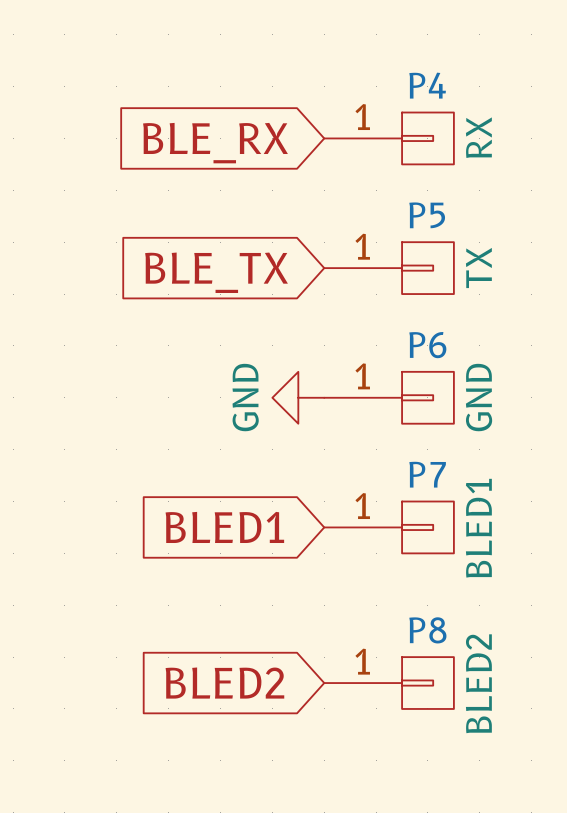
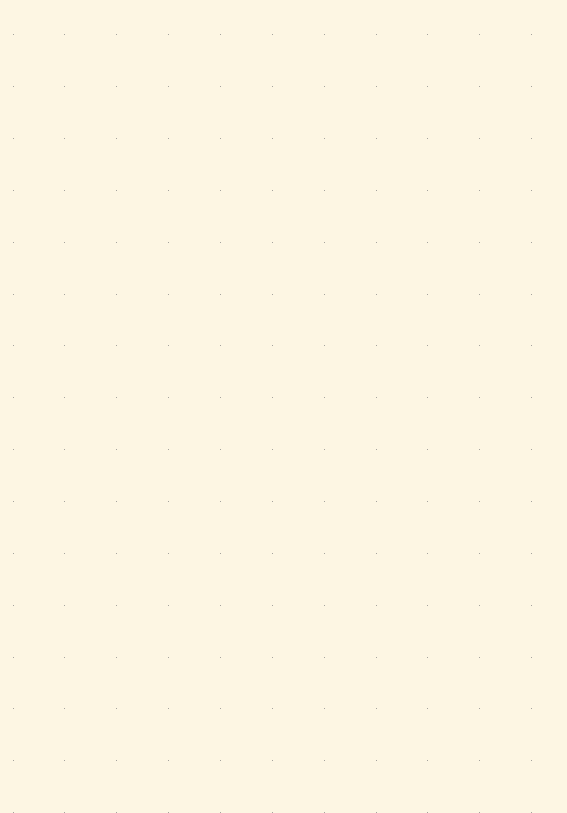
P4: RX (389, 138) -> none
global label: BLE_RX (215, 143) -> none
P5: TX (389, 268) -> none
global label: BLE_TX (216, 272) -> none
power symbol: GND (298, 397) -> none
P6: GND (389, 397) -> none
global label: BLED1 (224, 527) -> none
P7: BLED1 (389, 527) -> none
global label: BLED2 (224, 683) -> none
P8: BLED2 (389, 683) -> none

